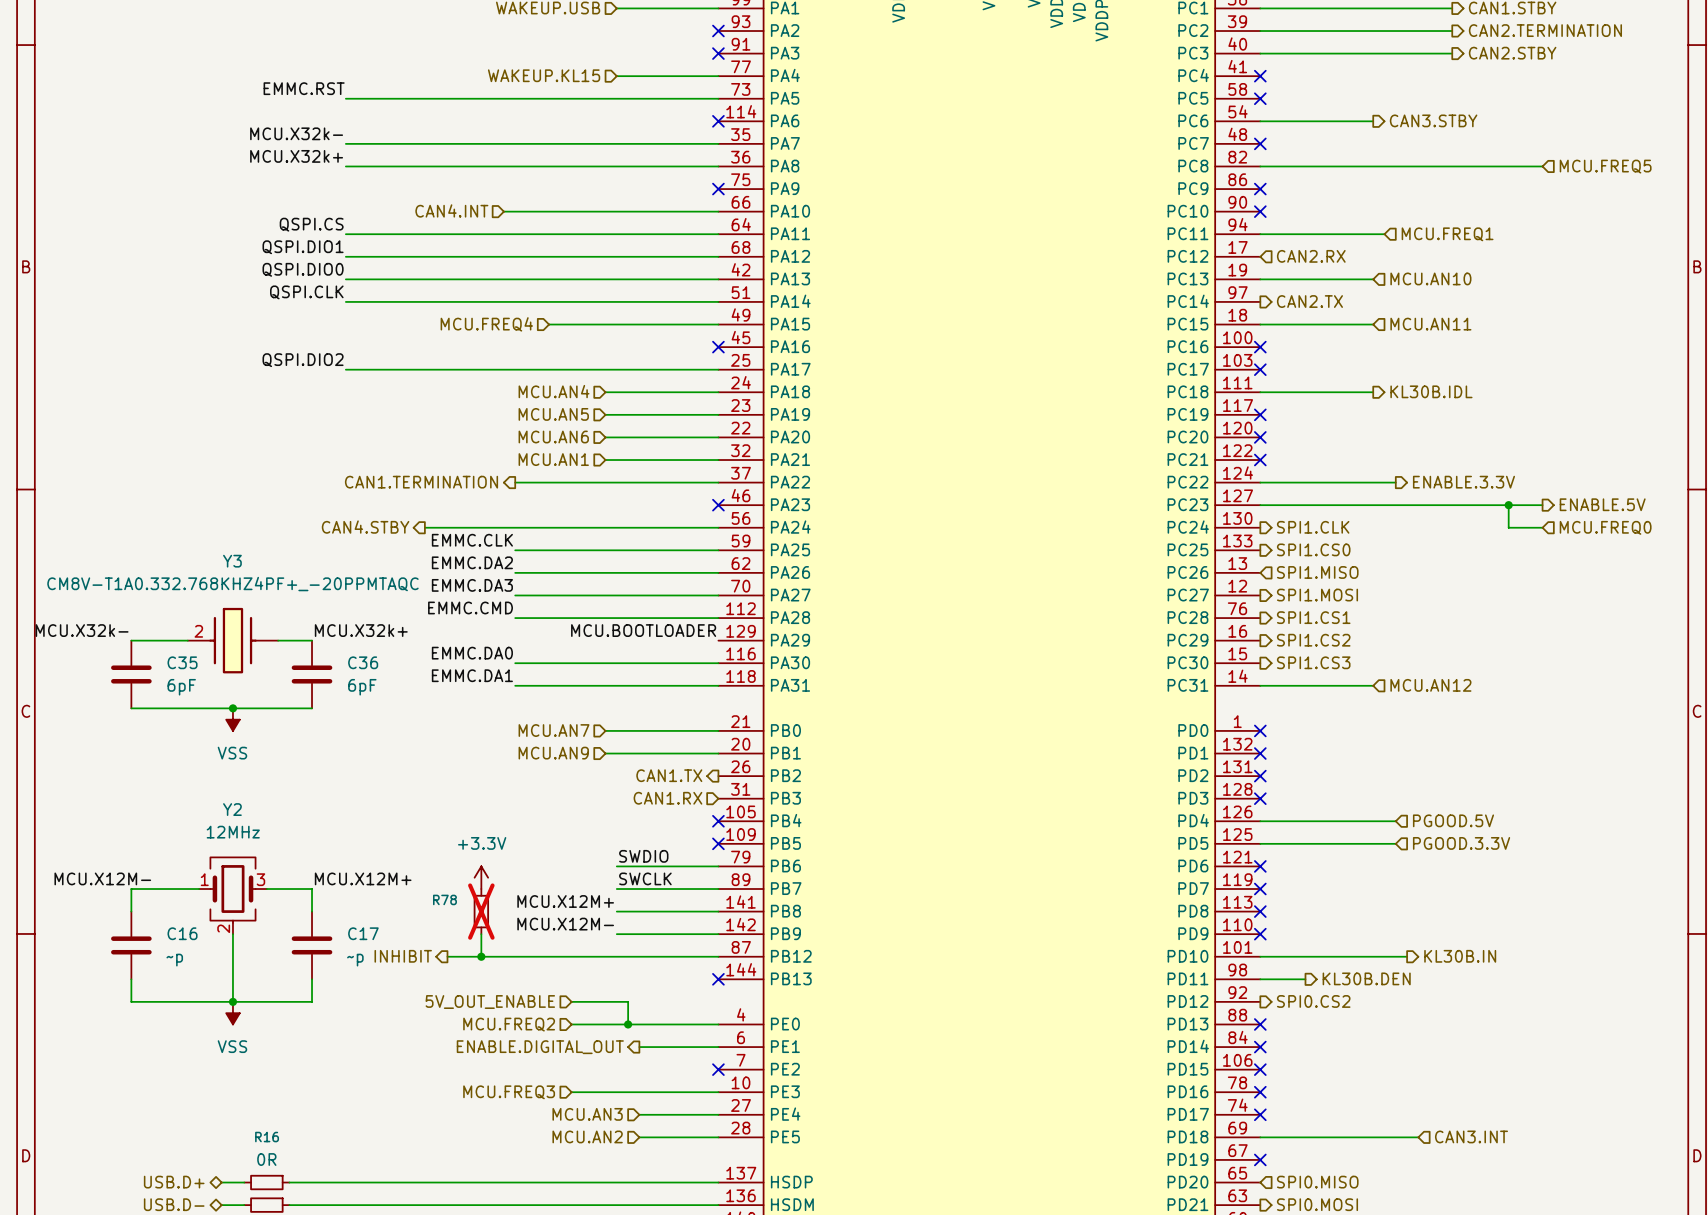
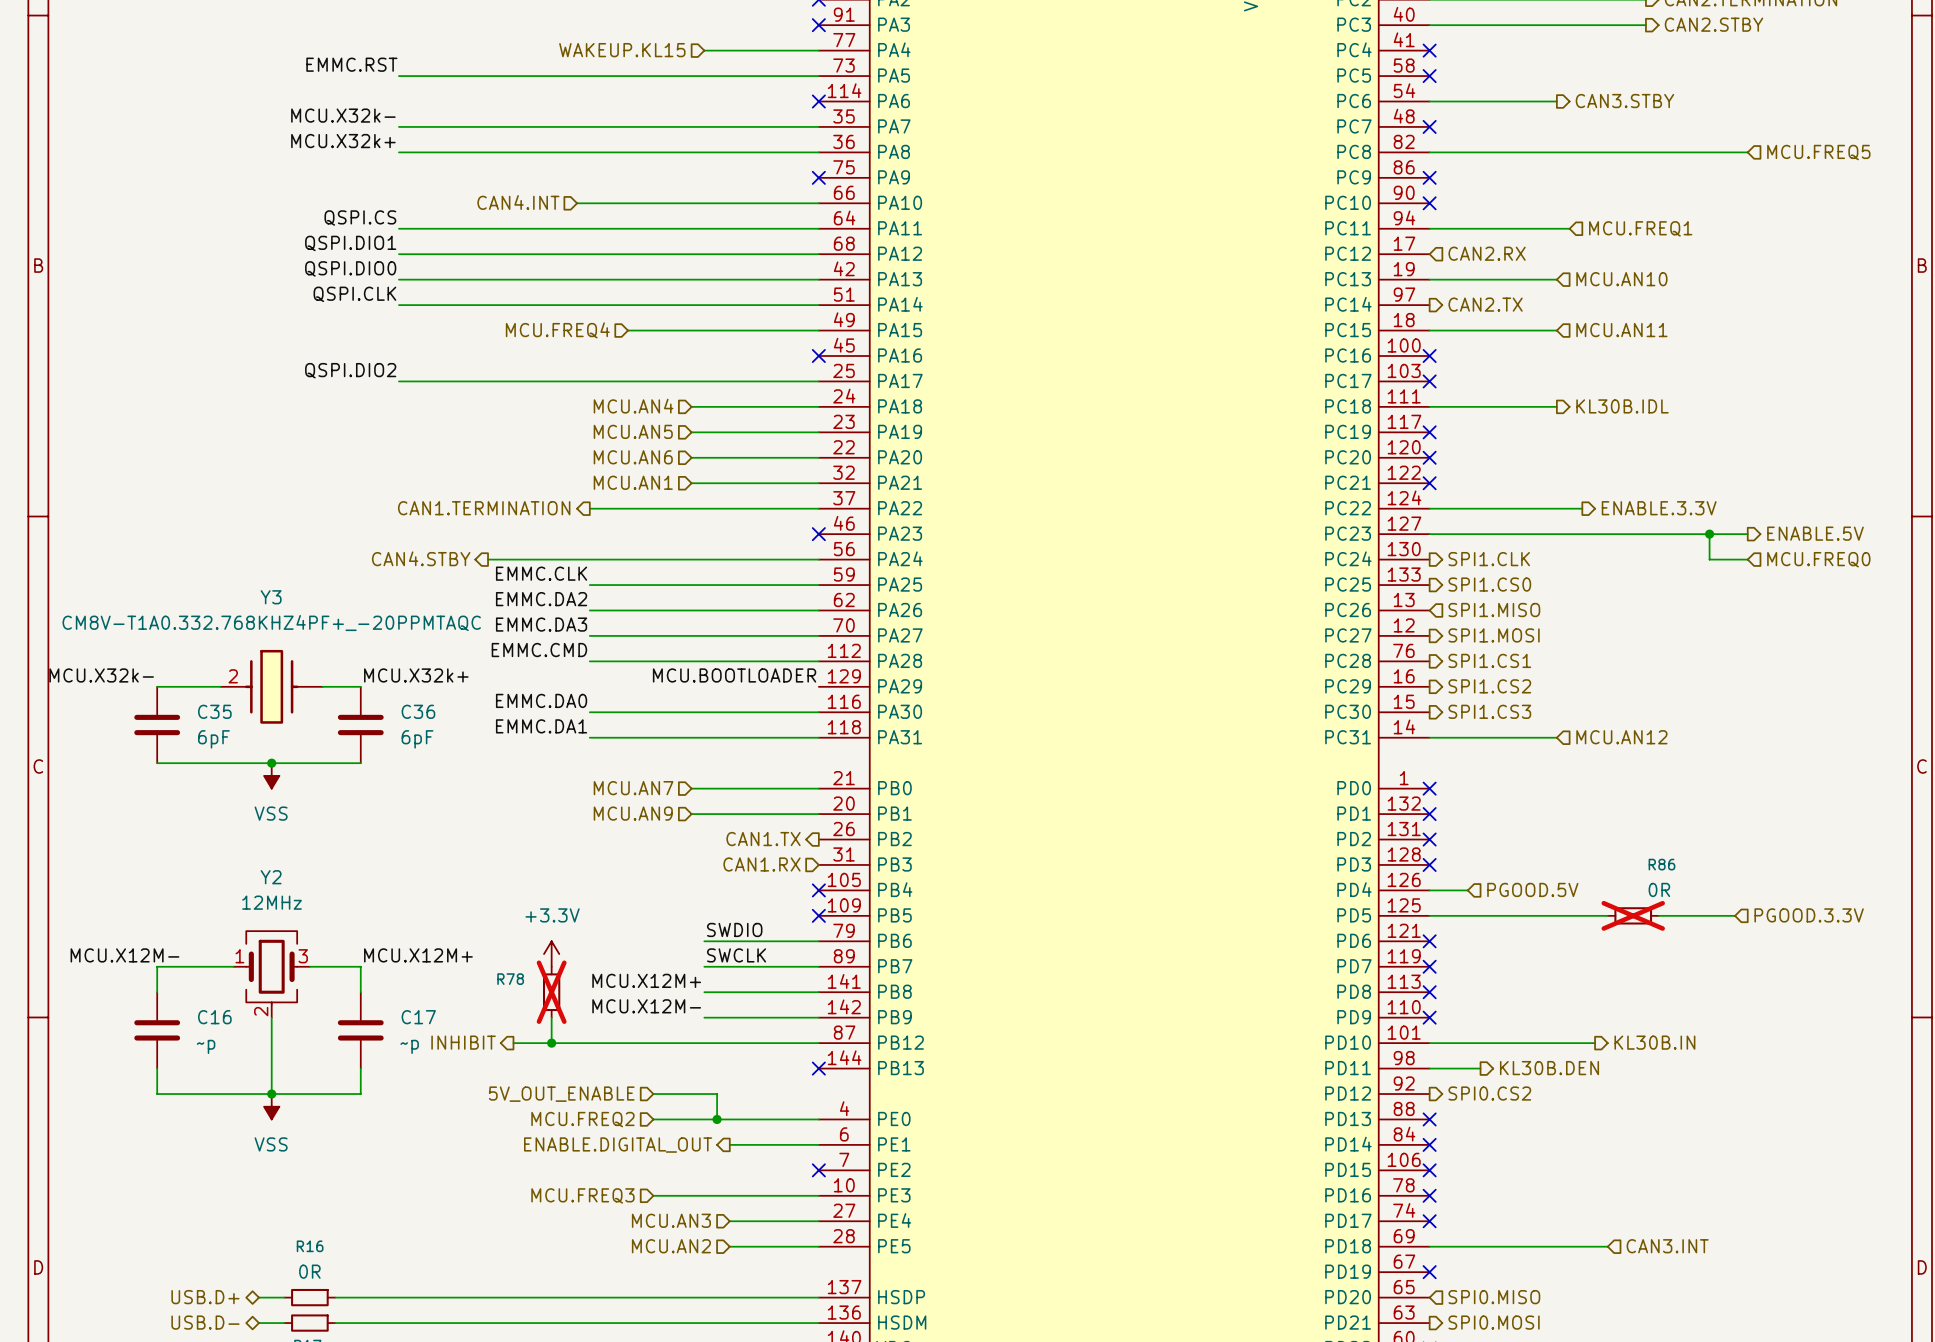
hierarchical label position: PGOOD.5V (1453, 820) -> PGOOD.5V (1532, 889)
wire: (1294, 821) (1395, 821) -> none
wire: none -> (1582, 915) (1607, 915)
R86: none -> 0R (1633, 915)
hierarchical label position: PGOOD.3.3V (1461, 843) -> PGOOD.3.3V (1809, 915)
wire: none -> (1658, 915) (1735, 915)

